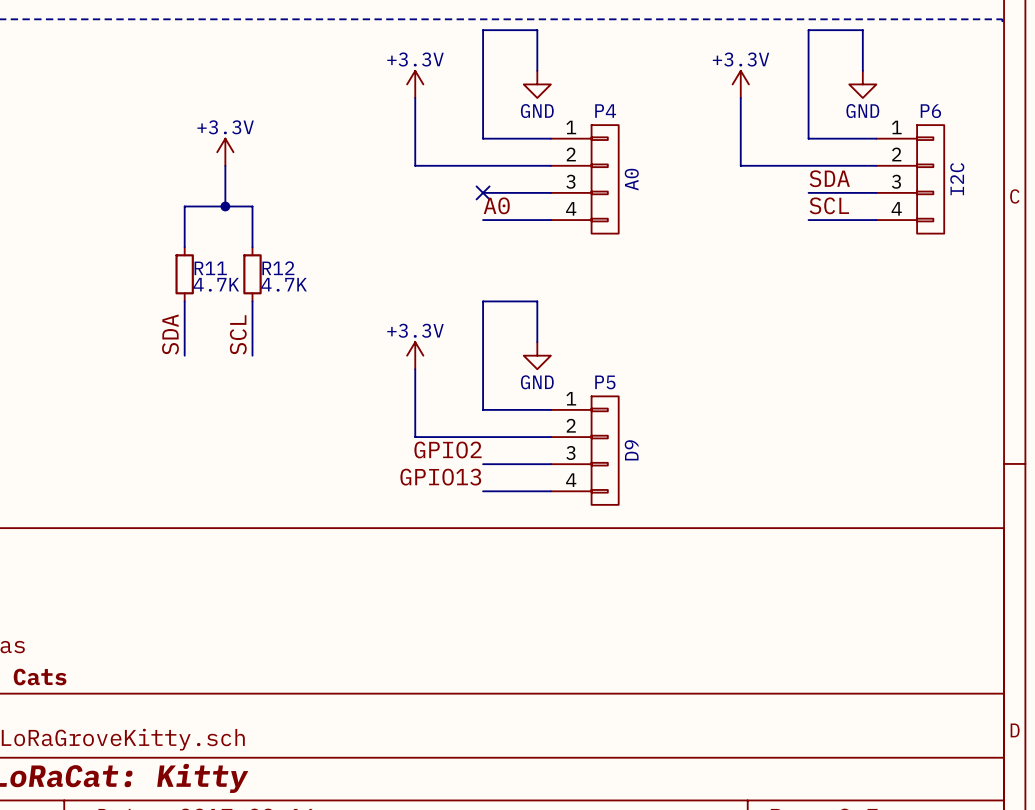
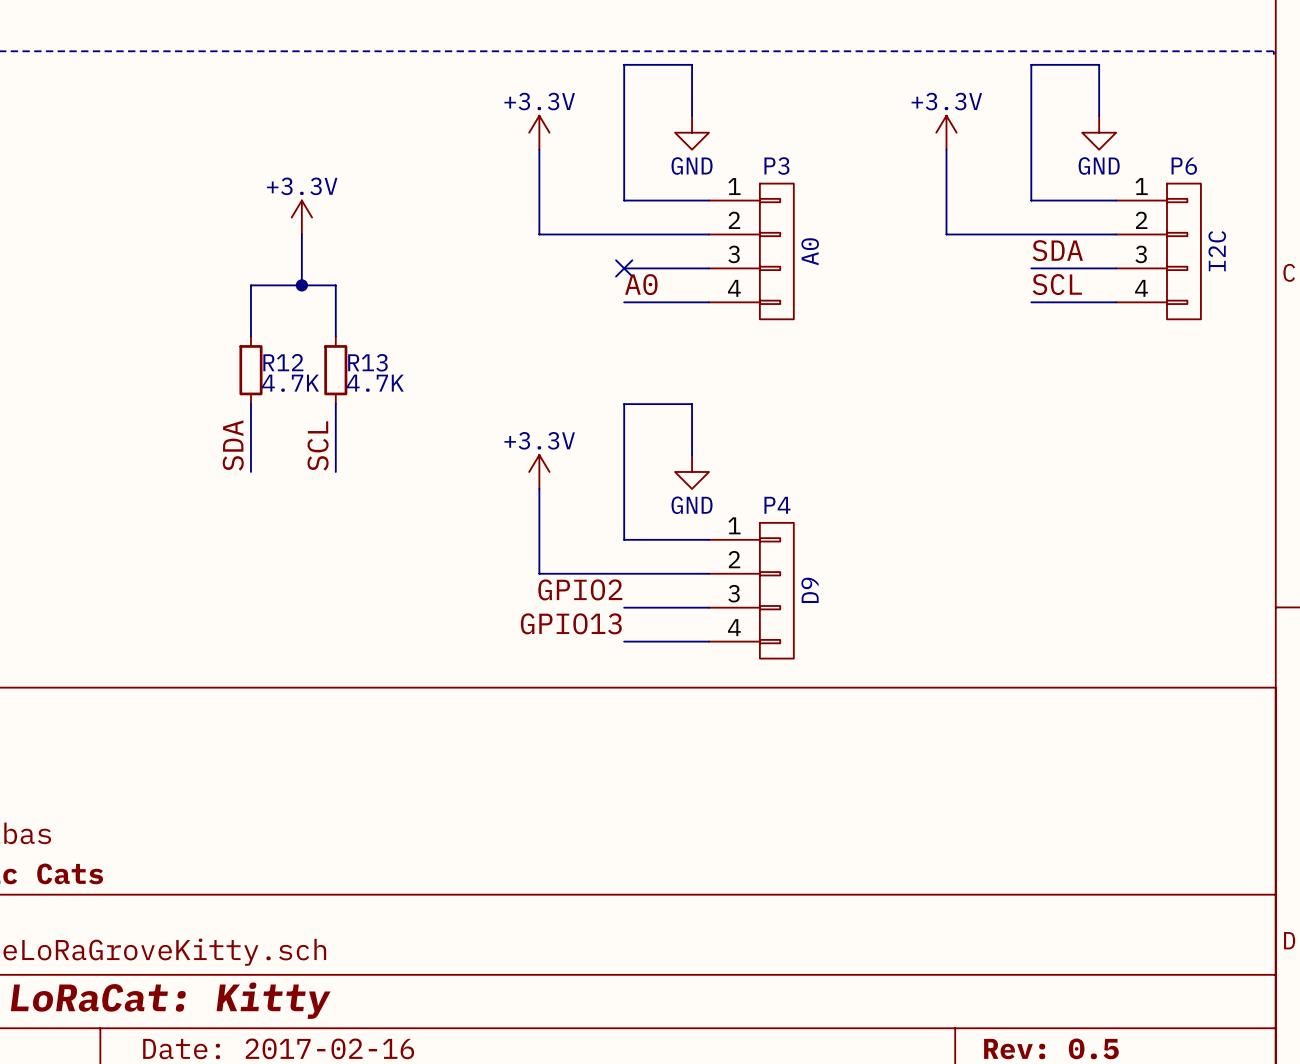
P4 name: P4 (605, 111) -> P3 (776, 166)
R11 name: R11 (210, 268) -> R12 (283, 362)
R12 name: R12 (278, 268) -> R13 (367, 362)
P5 name: P5 (605, 382) -> P4 (777, 505)

